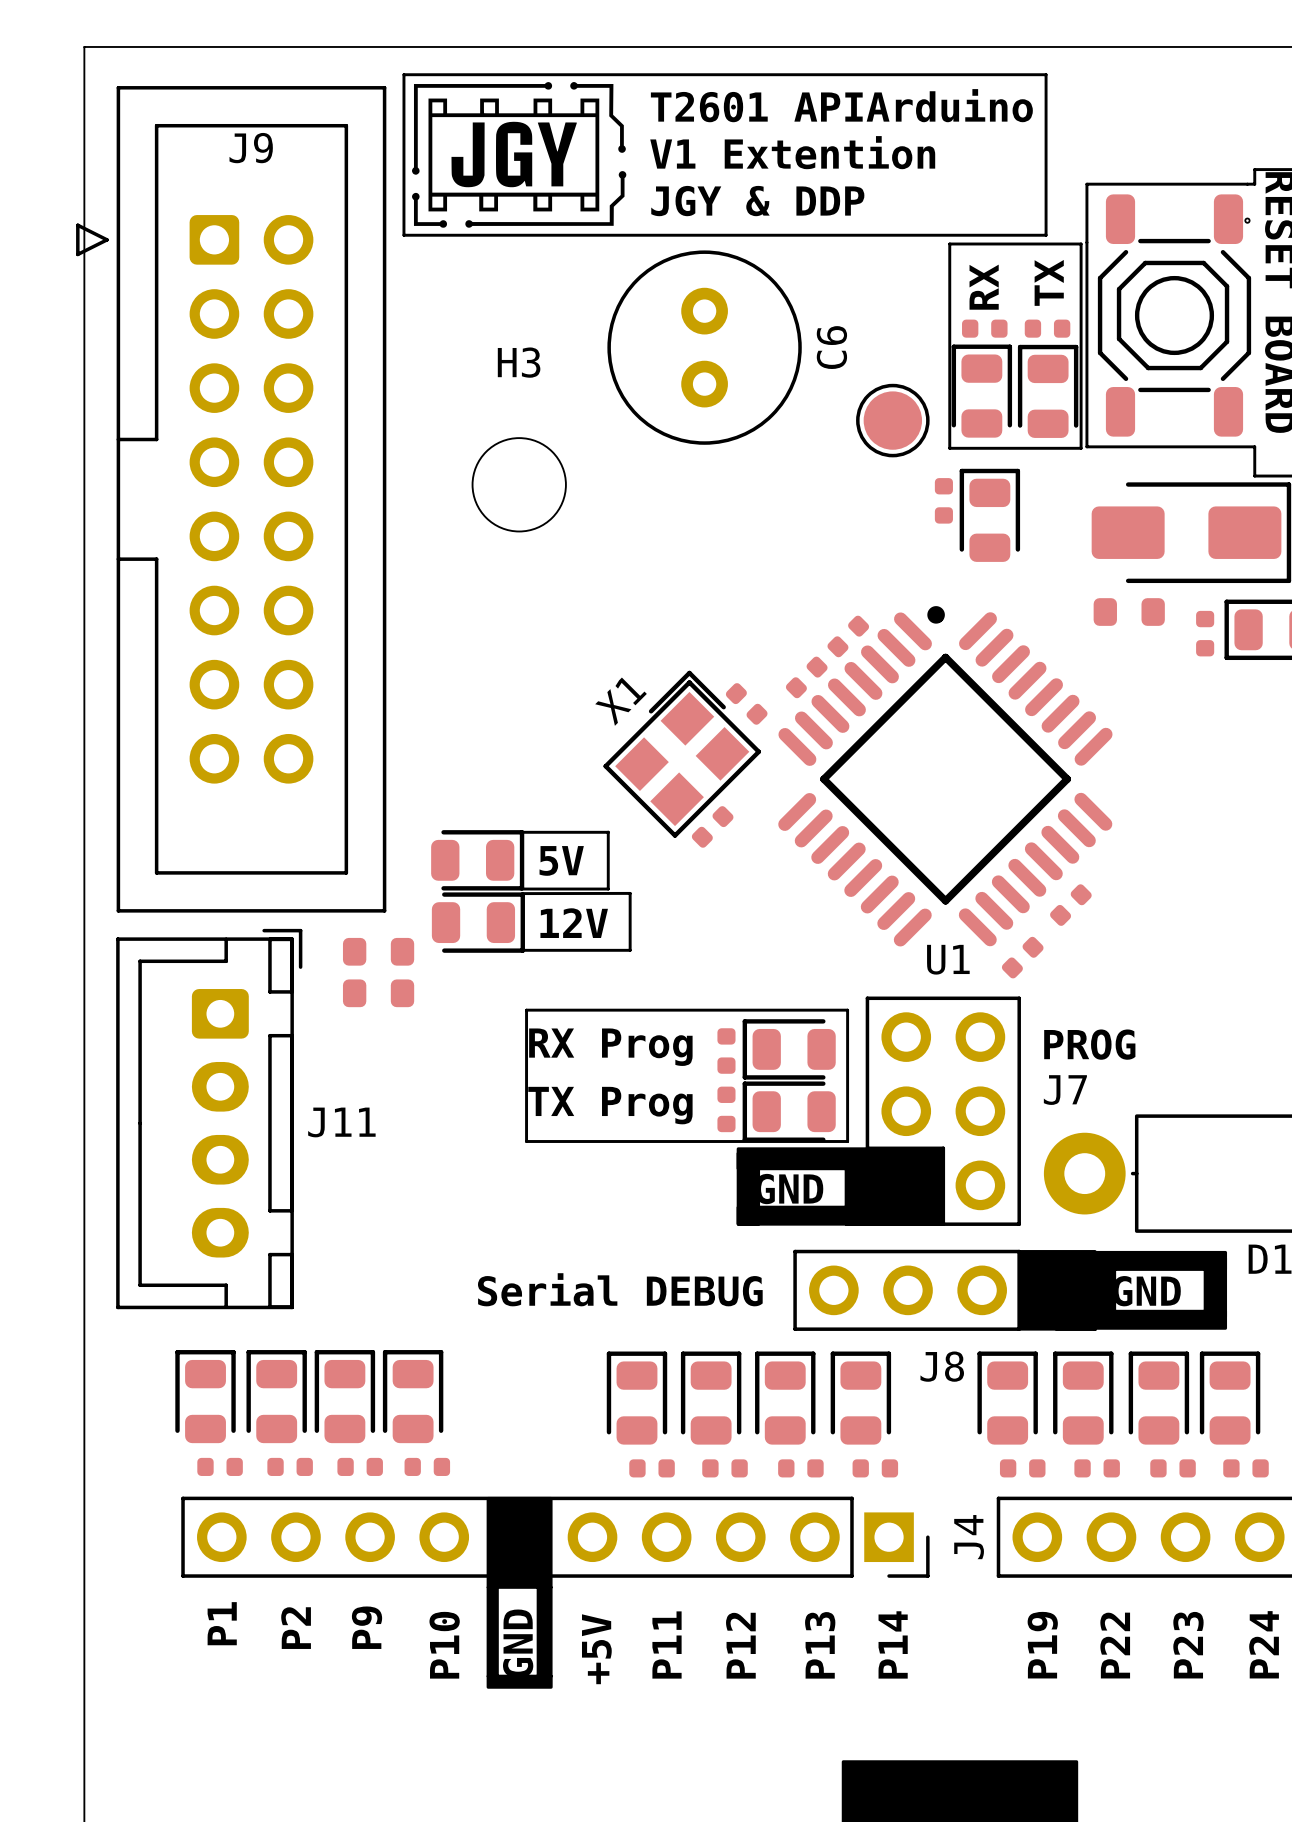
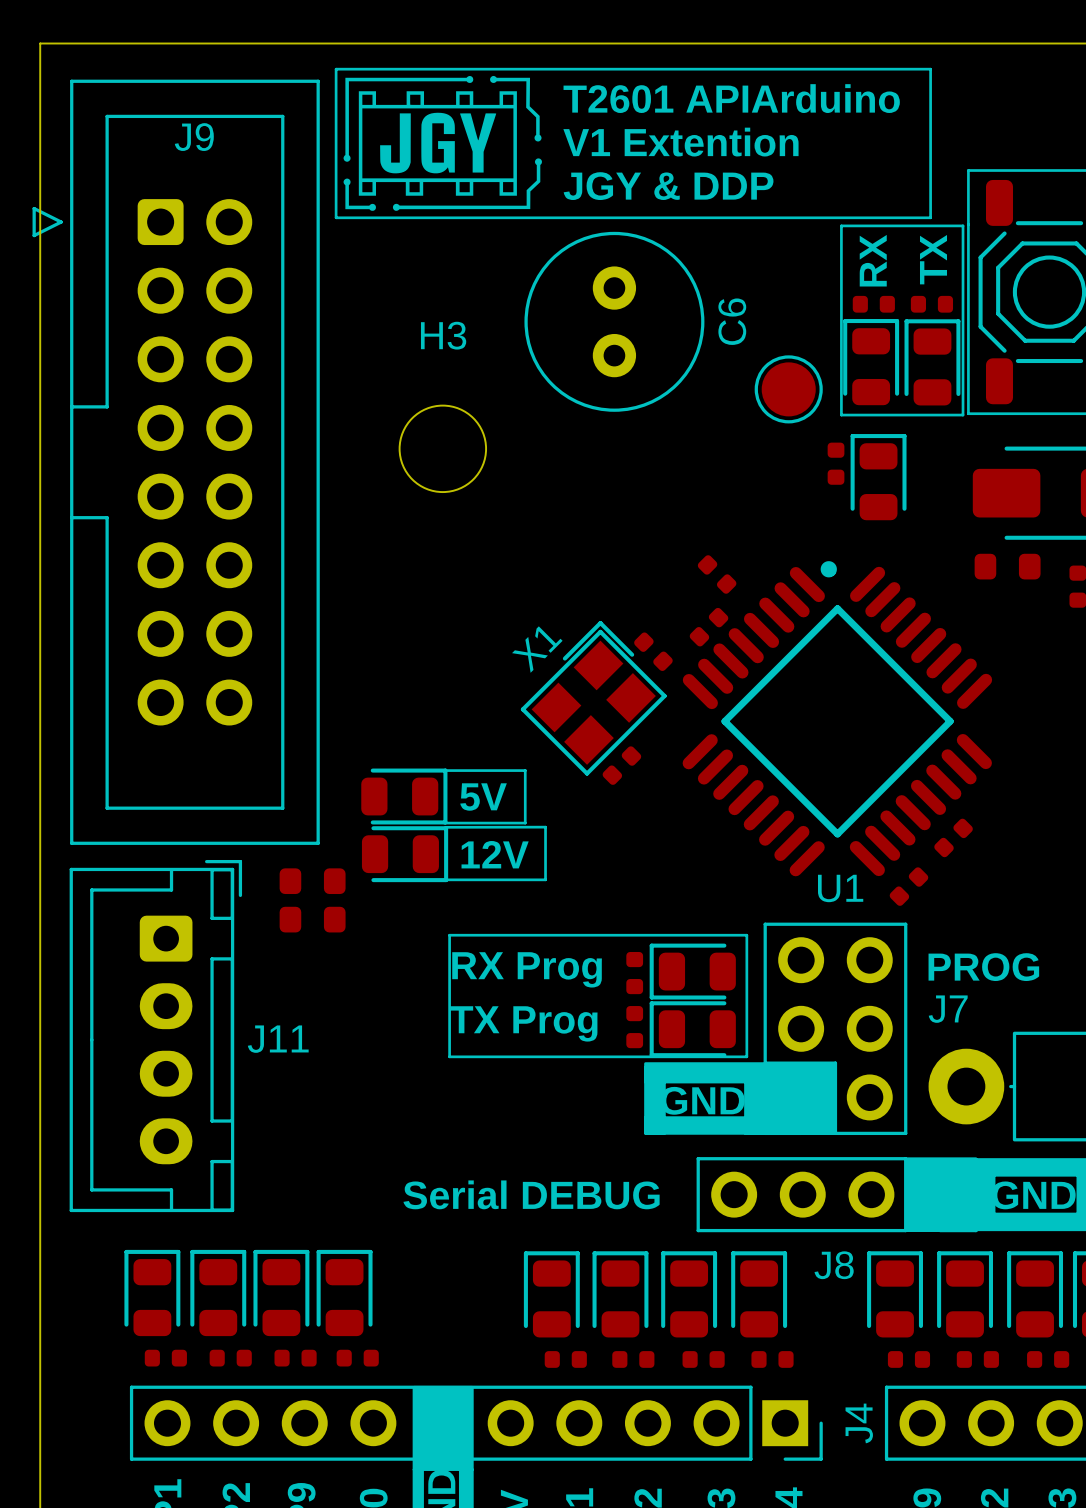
part rotation: 0° (848, 636) -> 90° clockwise (717, 574)
part position: (848, 636) -> (717, 574)

